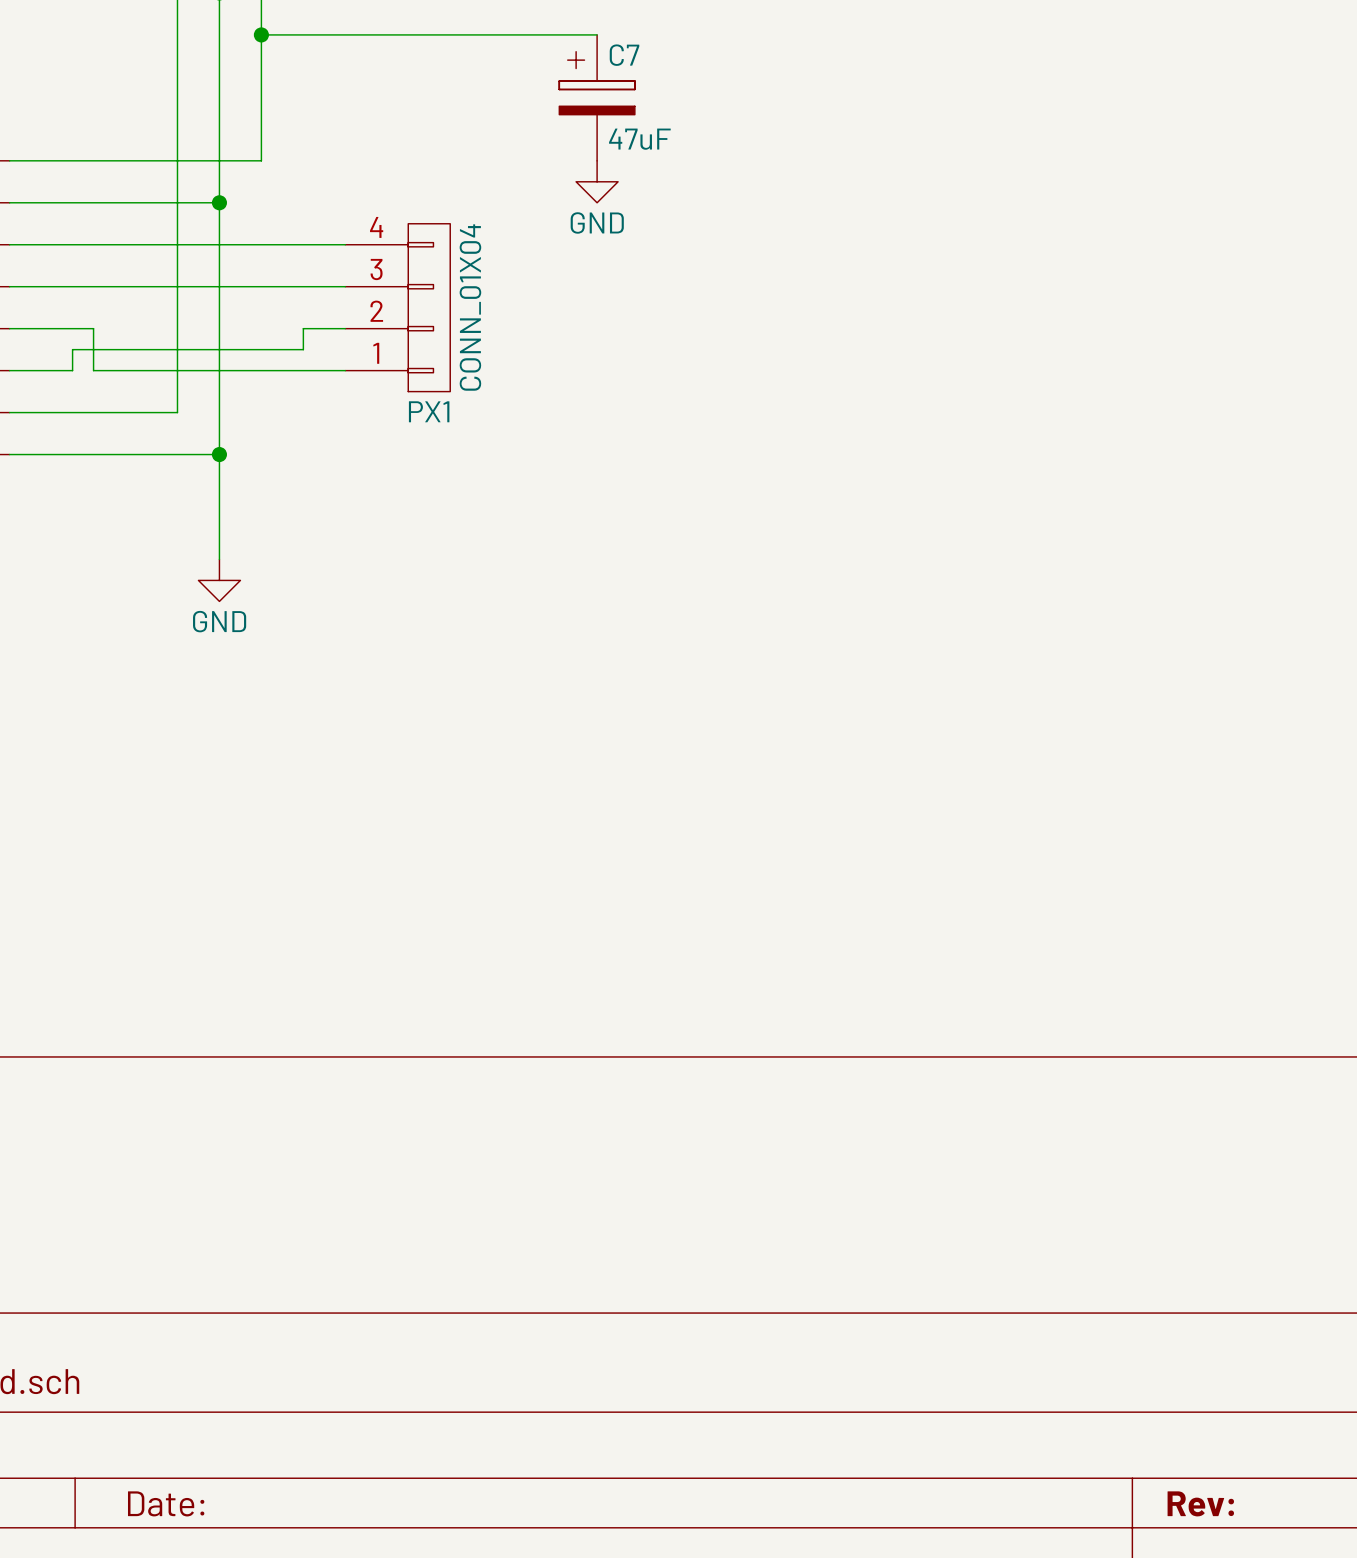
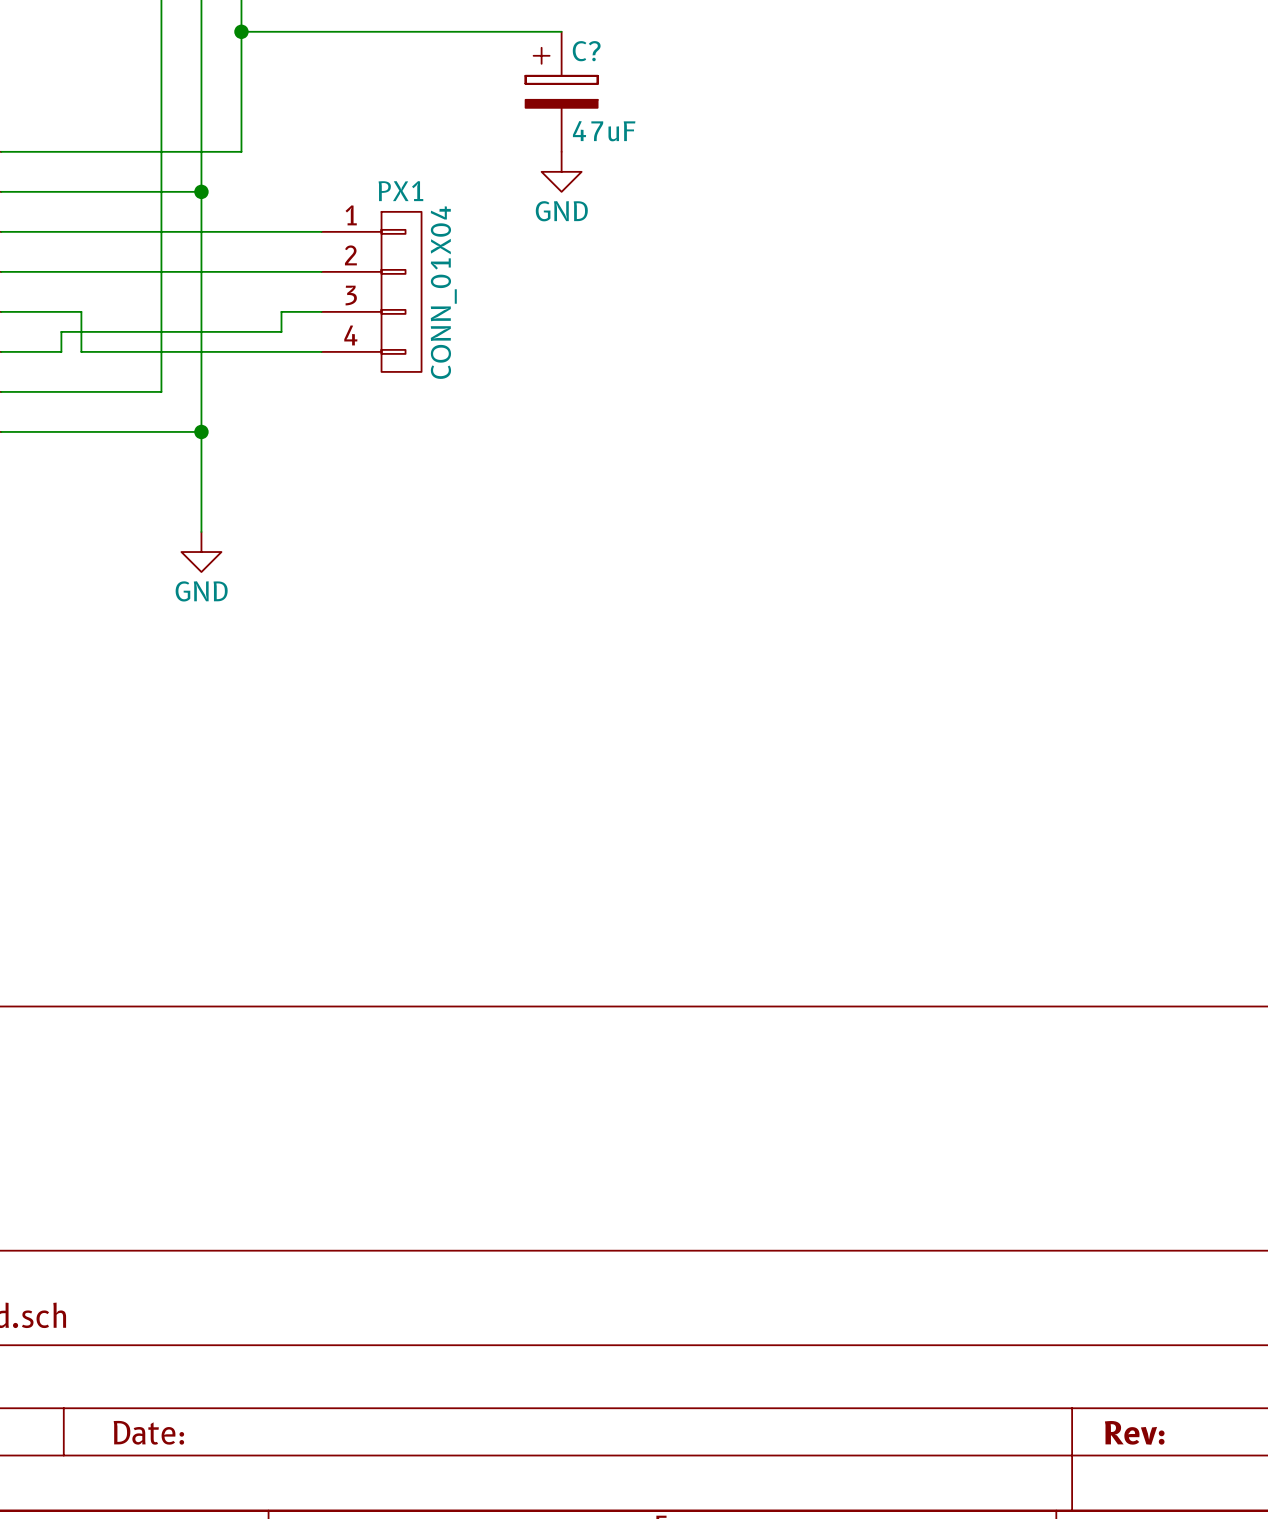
C7 name: C7 (624, 55) -> C? (586, 51)
PX1 flip: as is (429, 307) -> up-down (401, 291)

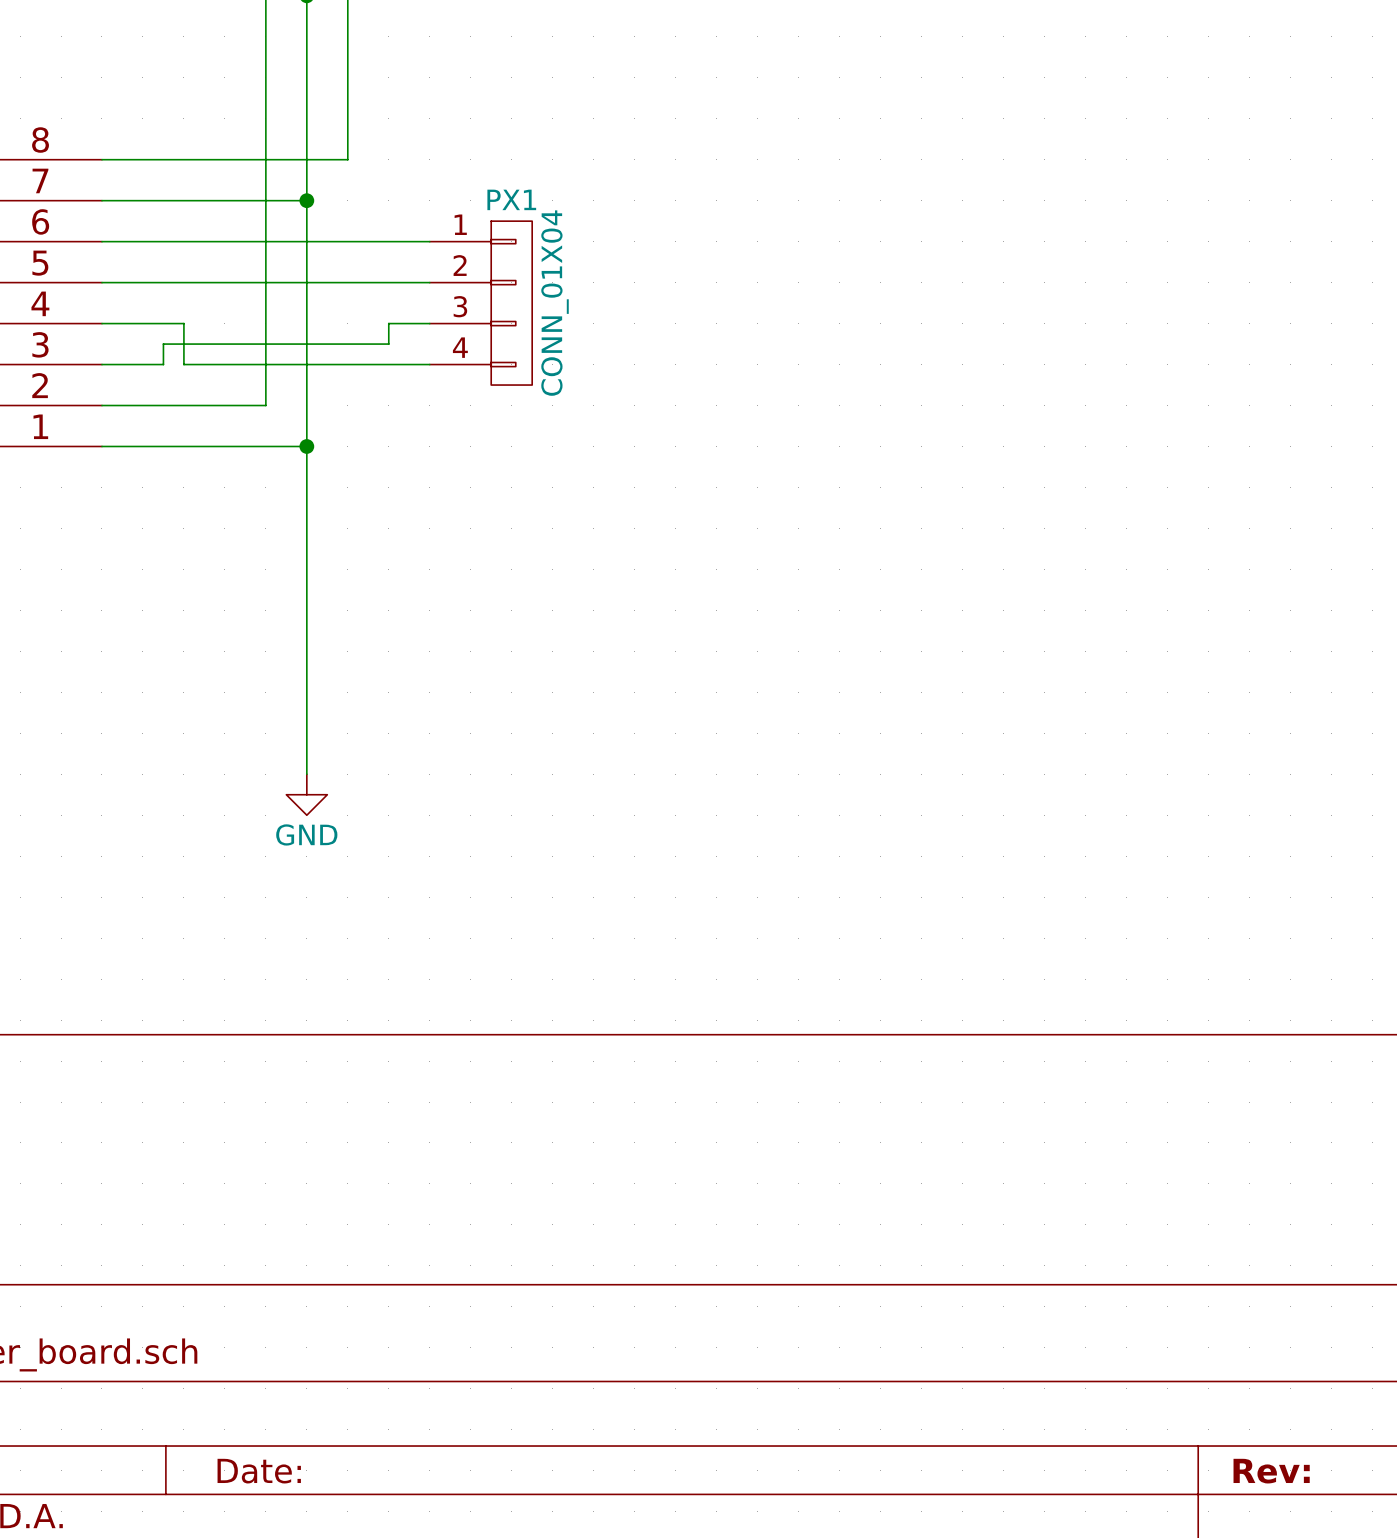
wire: (241, 31) (561, 31) -> none
junction: (241, 31) -> none
C?: 47uF (561, 91) -> none
power symbol: GND (561, 171) -> none
wire: none -> (306, 548) (306, 774)
power symbol position: GND (201, 552) -> GND (306, 794)

